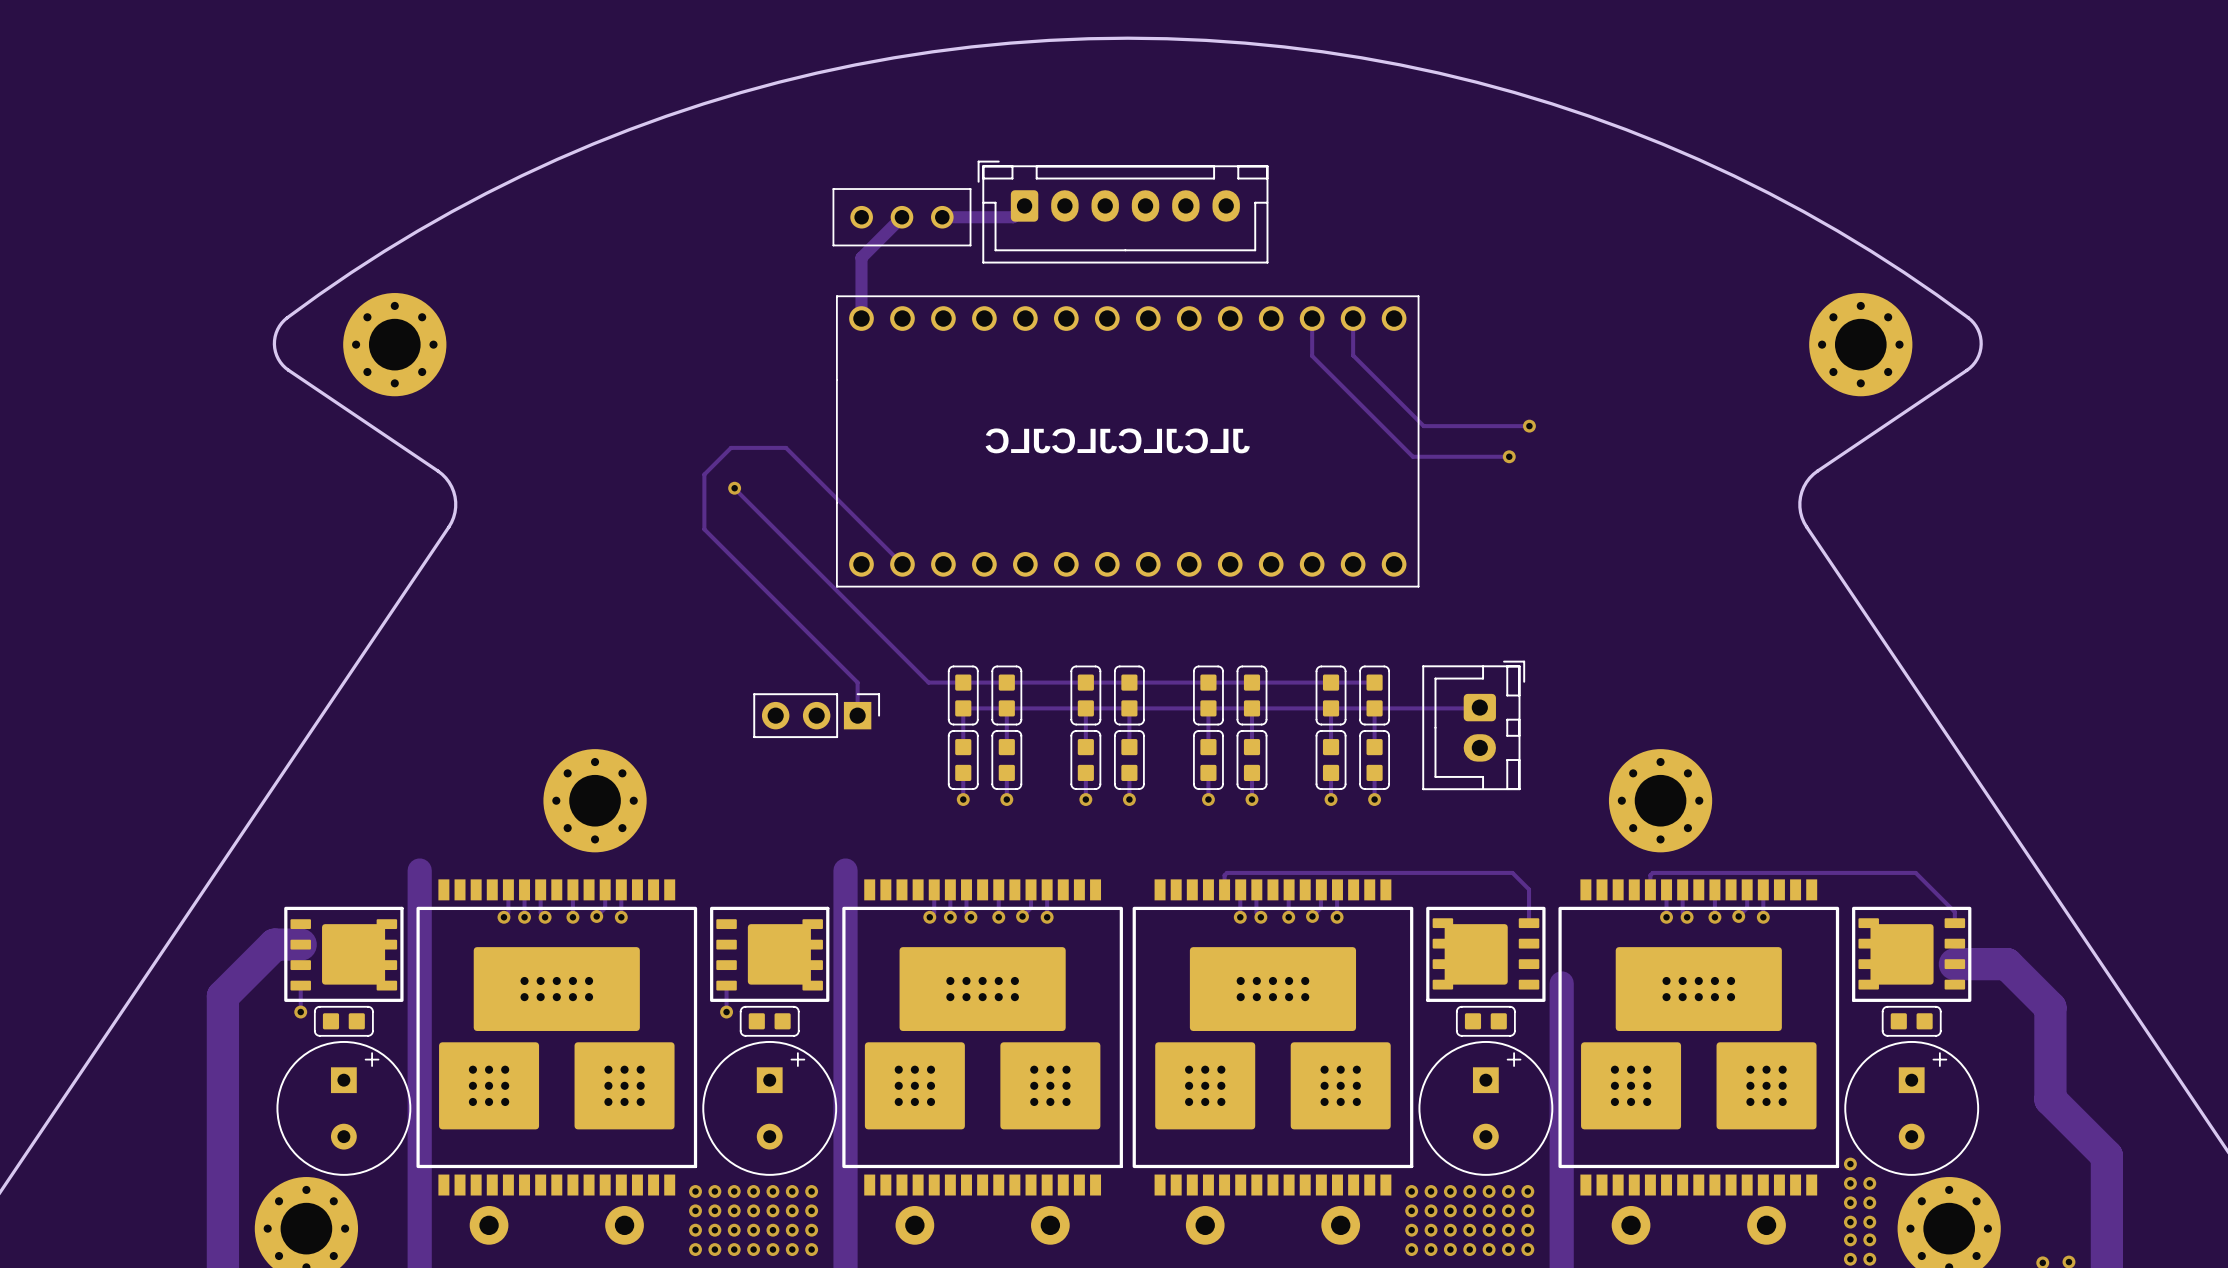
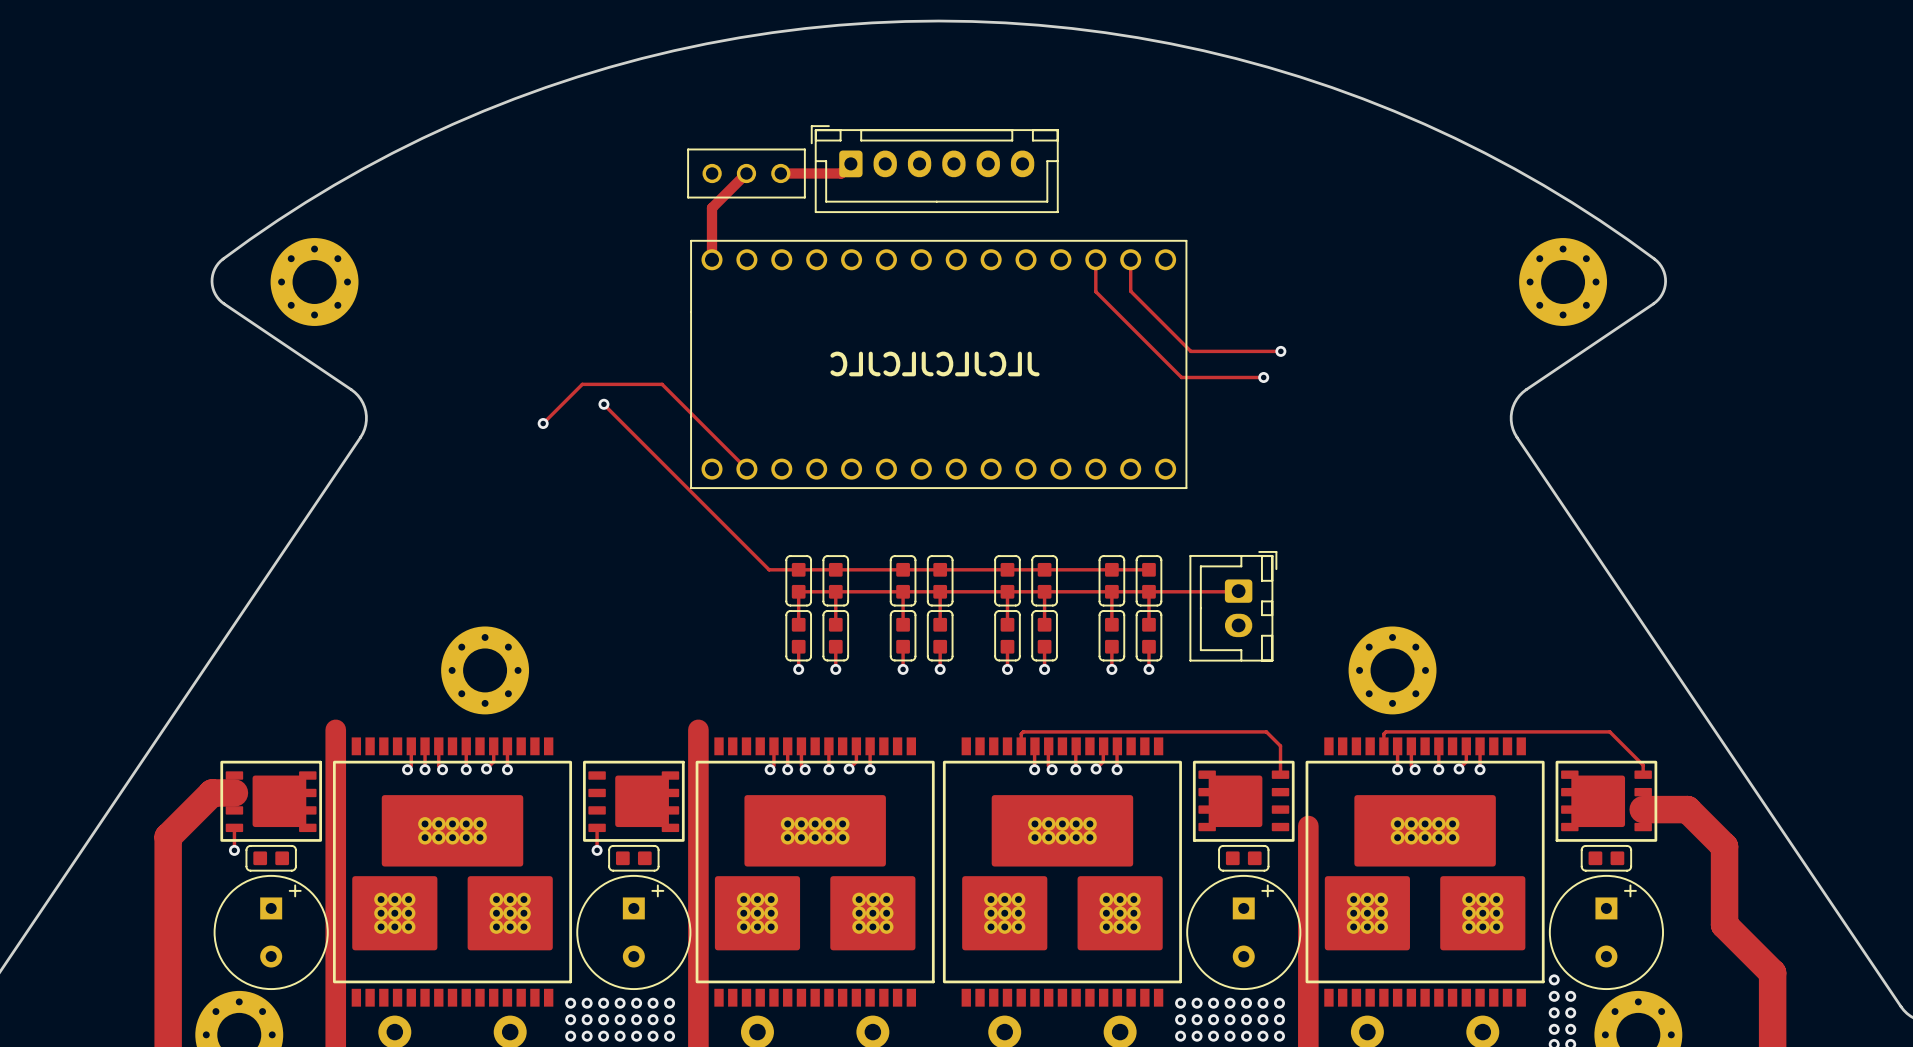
track: (802, 464) (786, 447) (731, 447) (704, 474) (704, 529) (857, 682) (857, 715) -> (662, 384) (582, 384) (543, 423)
via: none -> (543, 423)
part: (816, 715) -> none

